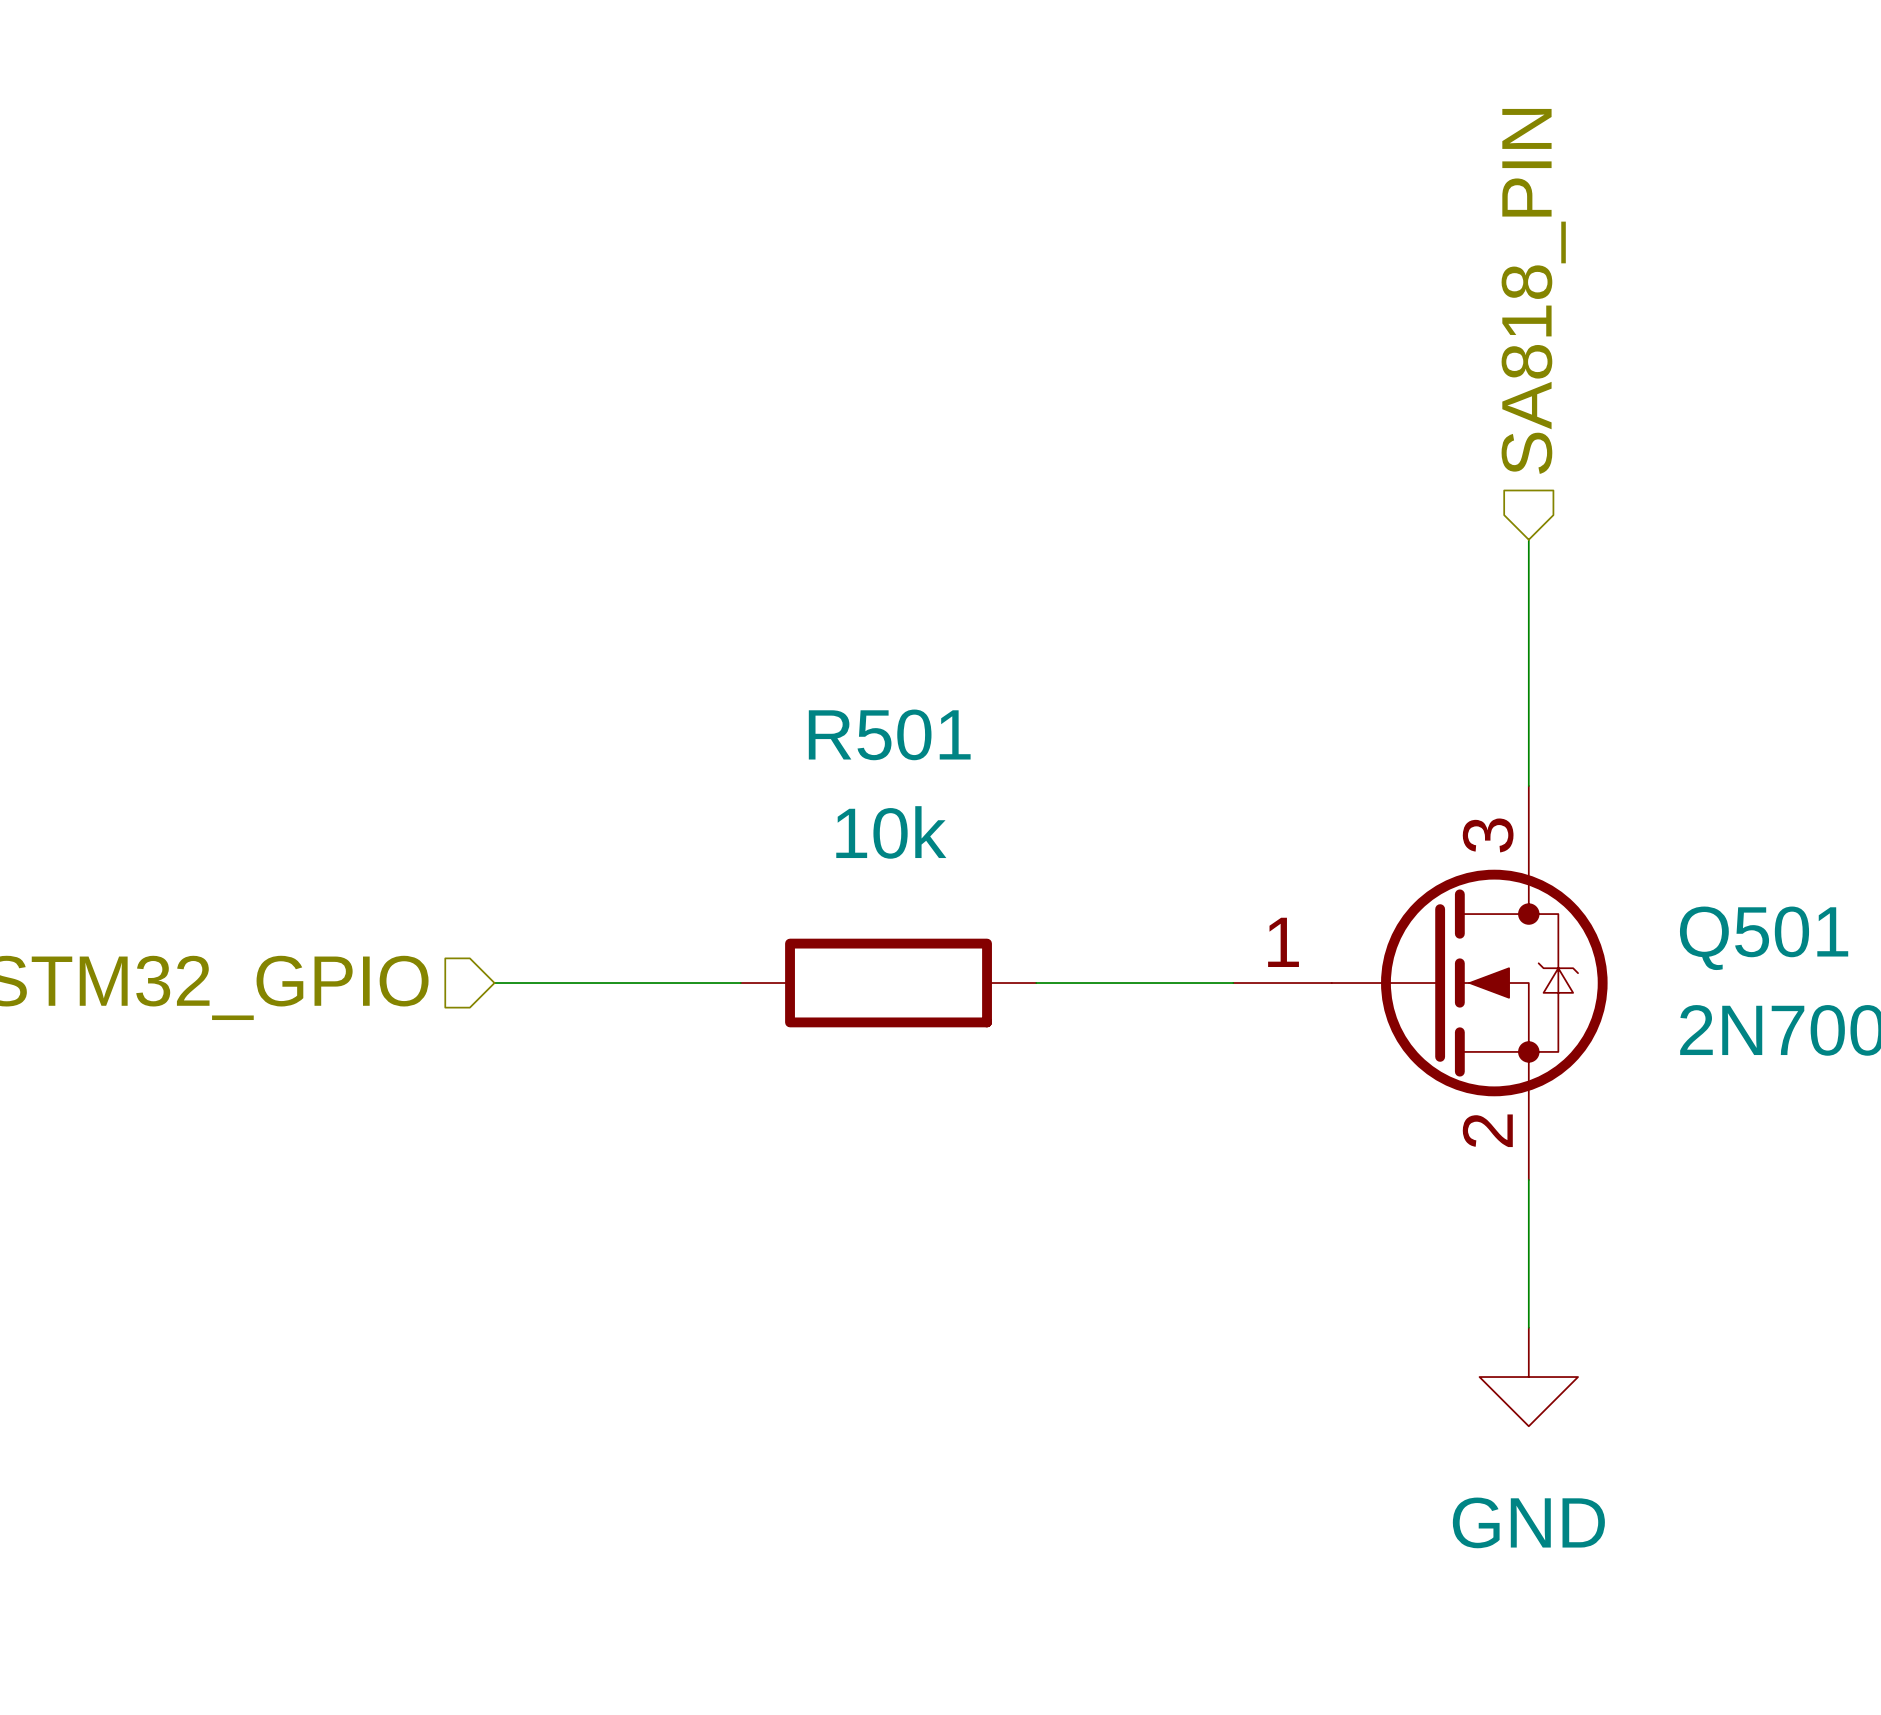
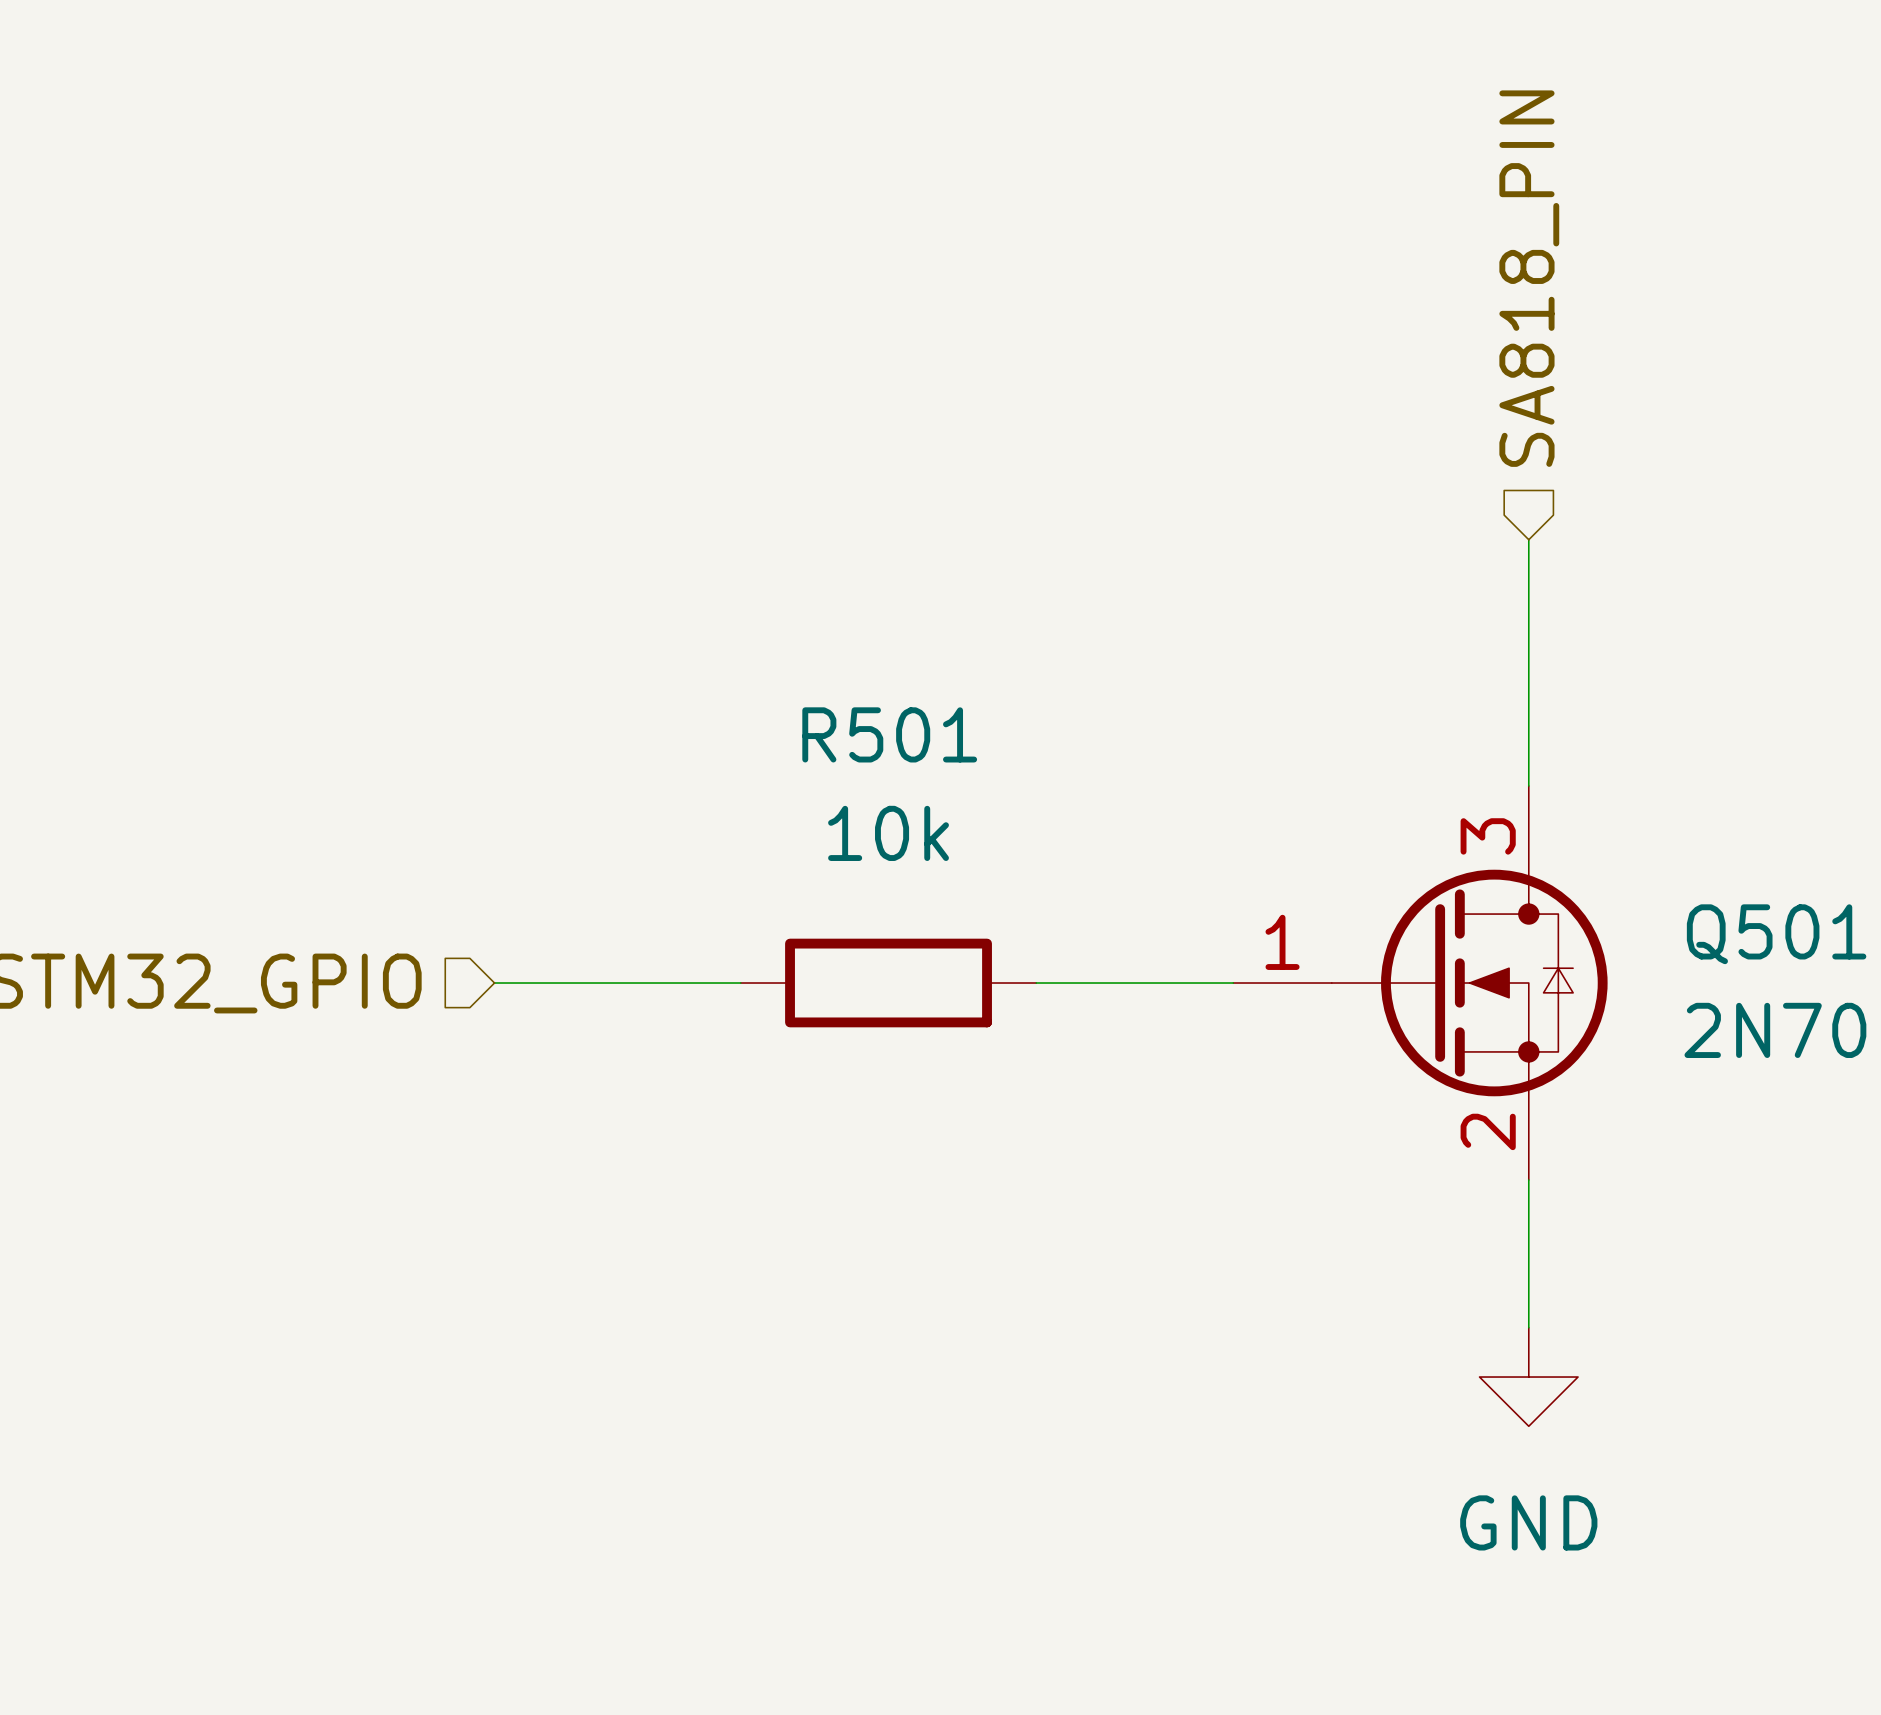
Q501 symbol: [1233, 785, 1608, 1181] -> [1233, 785, 1608, 1181]

